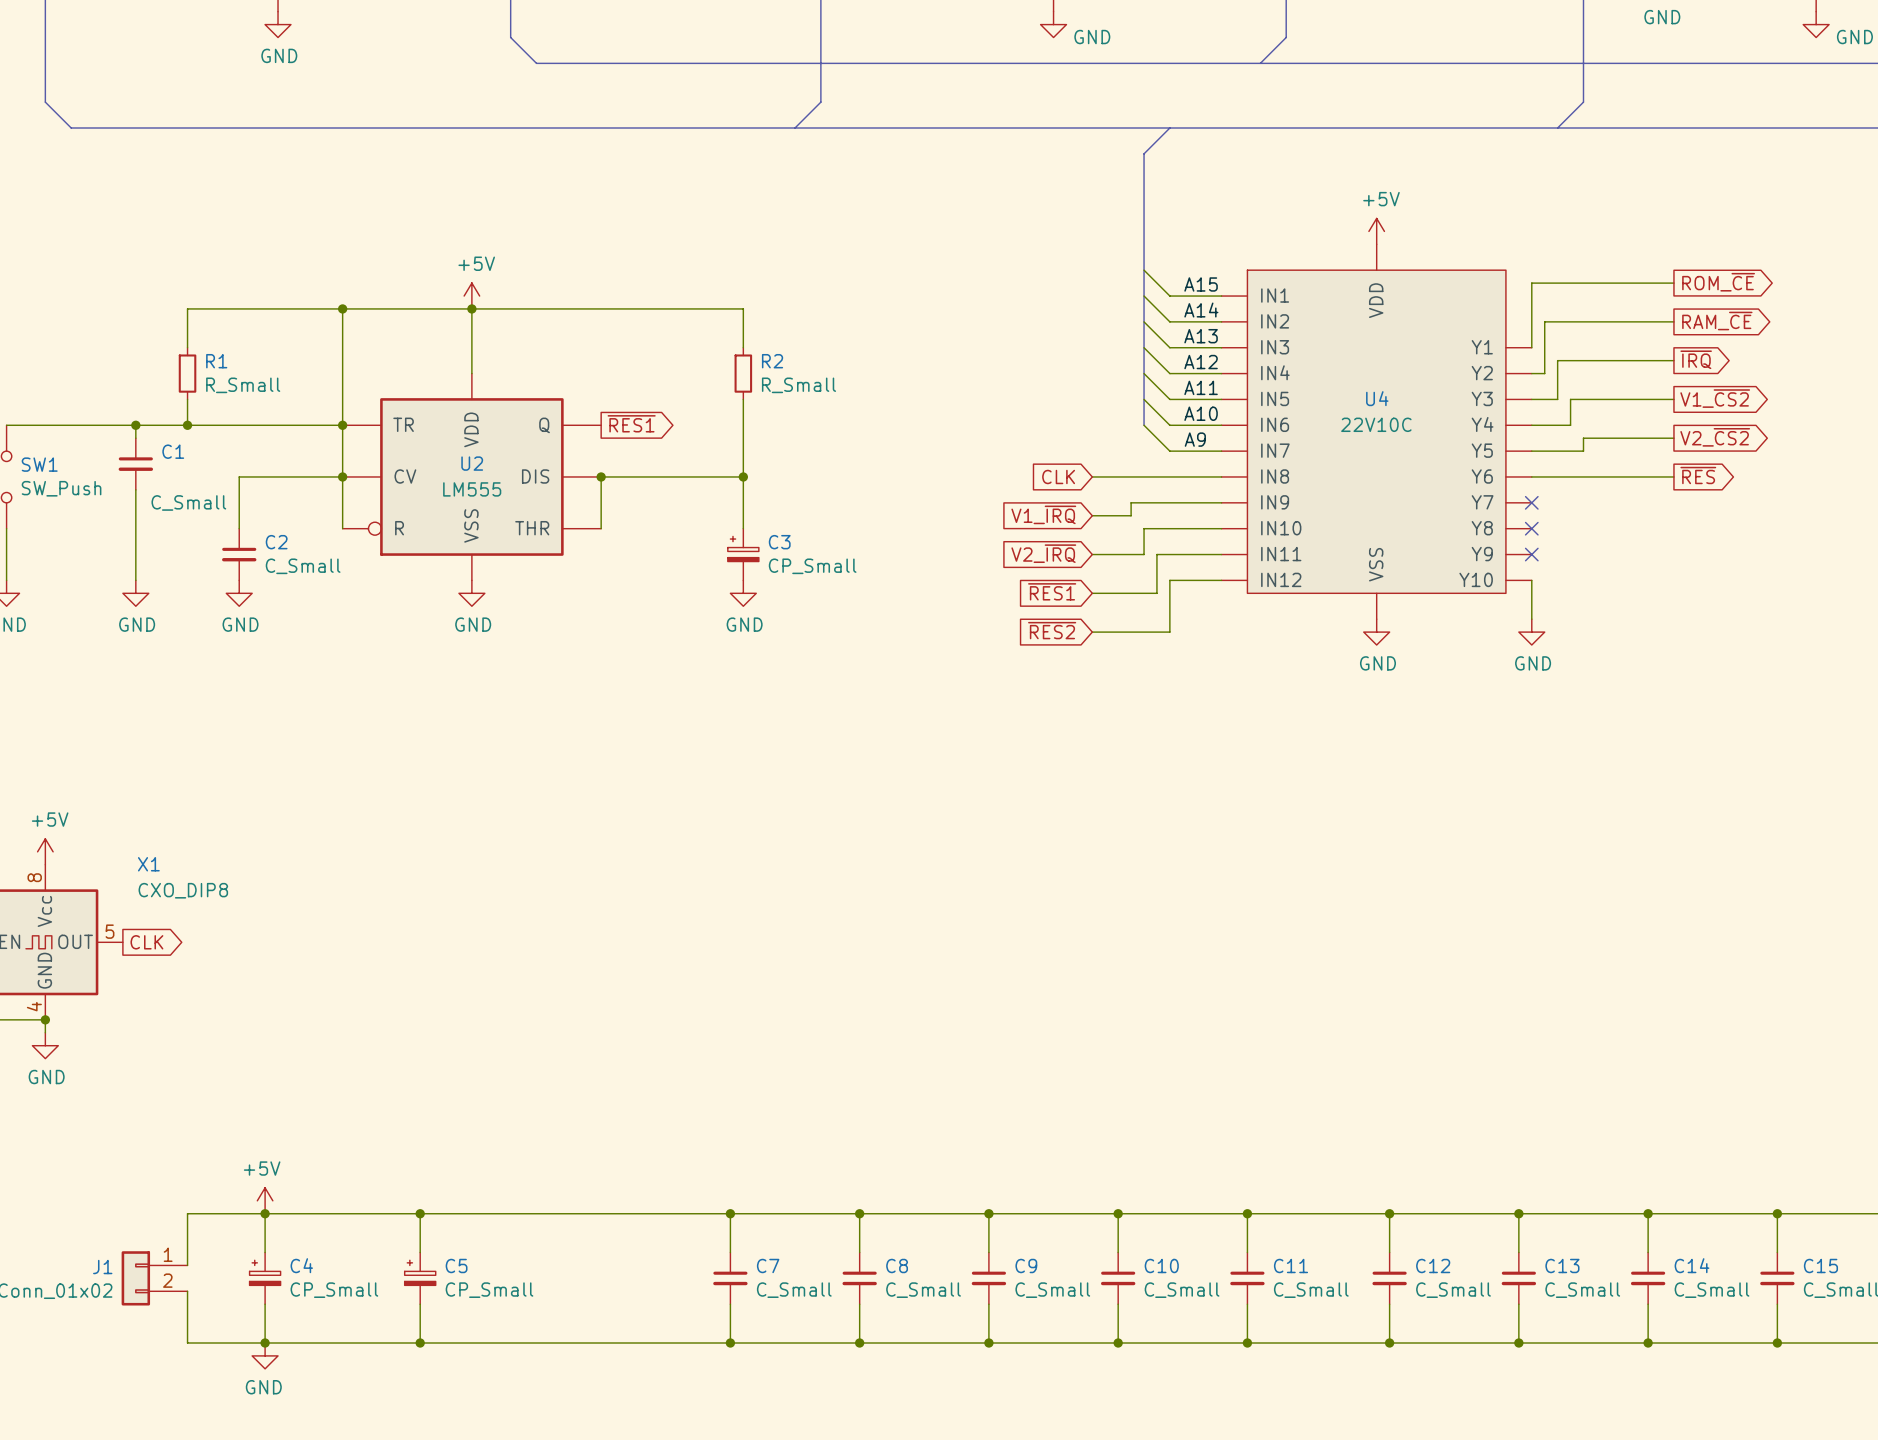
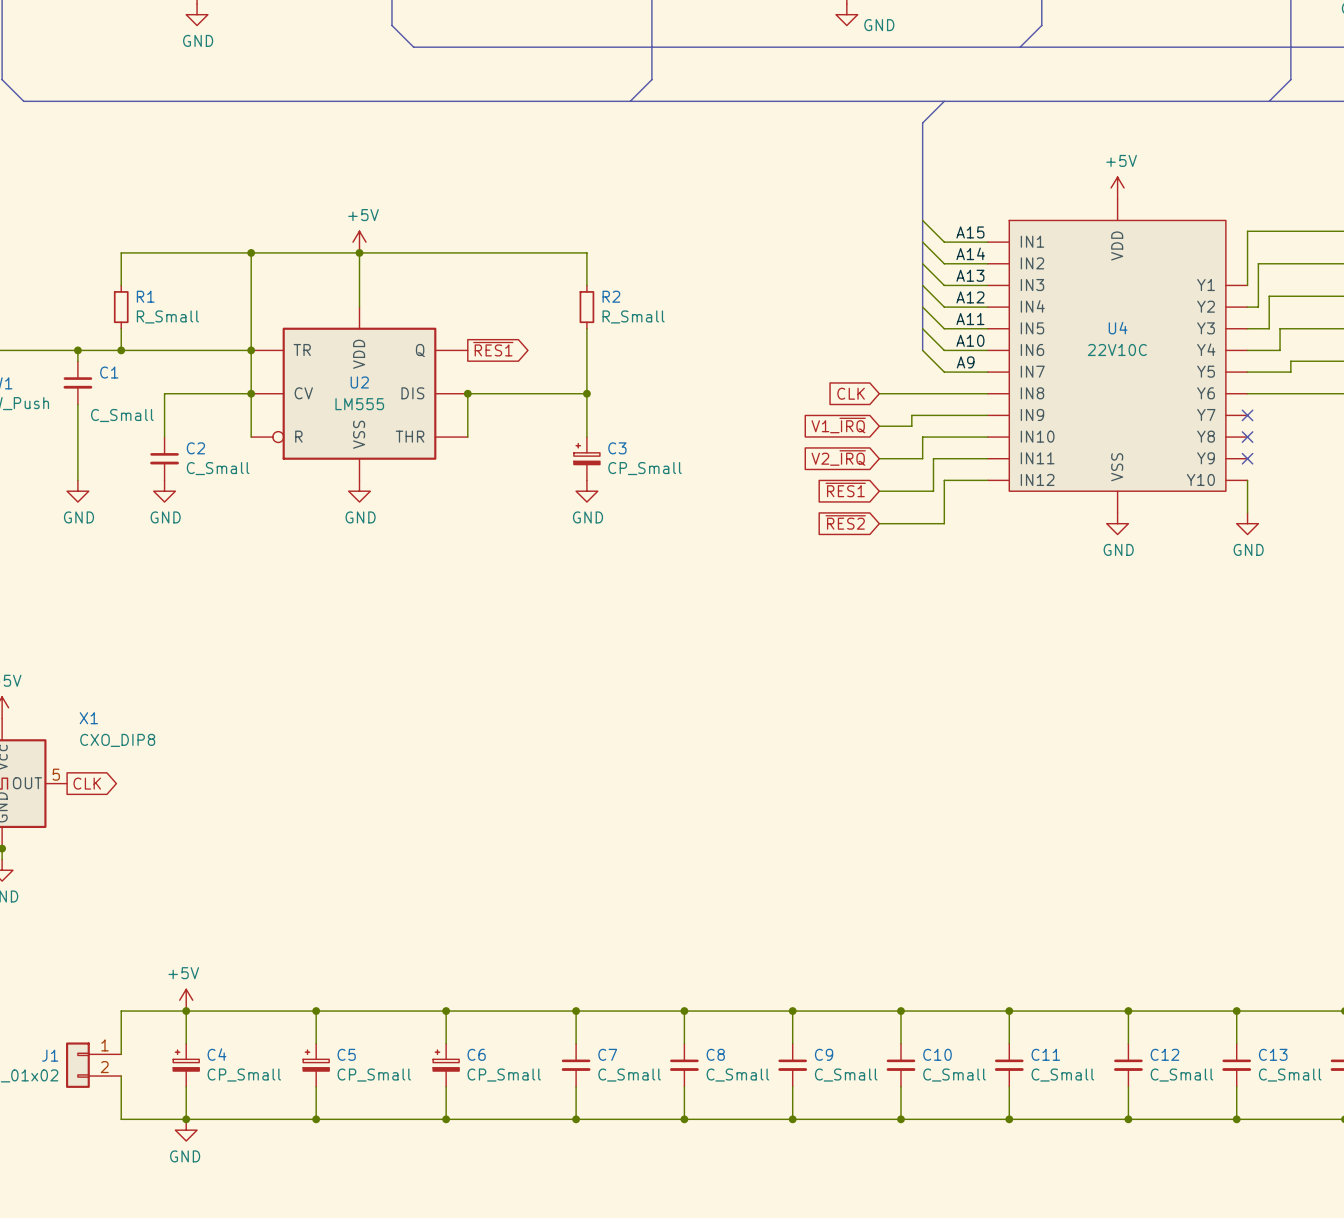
wire: none -> (446, 1011) (446, 1043)
junction: none -> (446, 1011)
C6: none -> CP_Small (446, 1065)
wire: none -> (446, 1086) (446, 1119)
junction: none -> (446, 1119)

